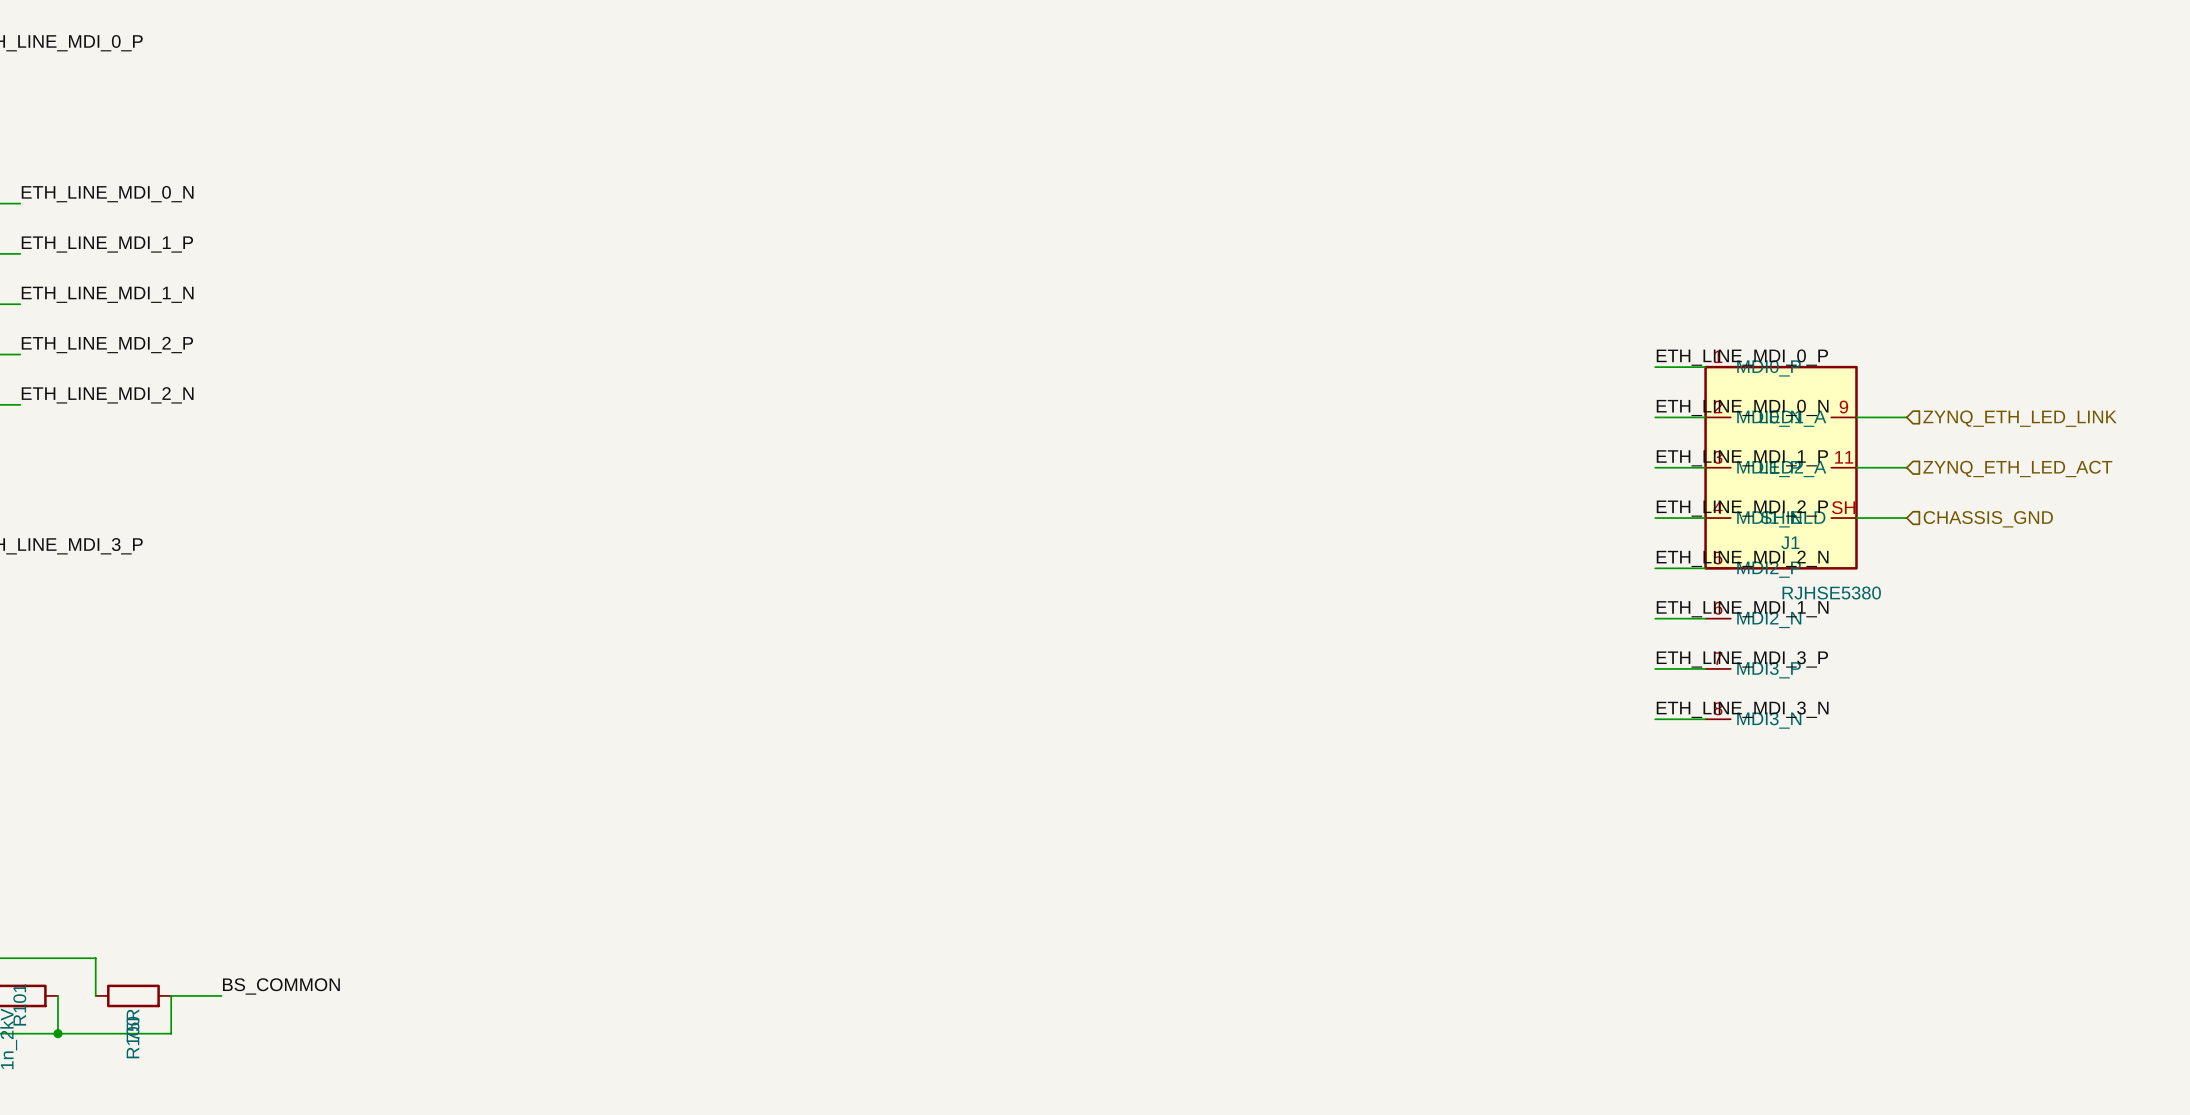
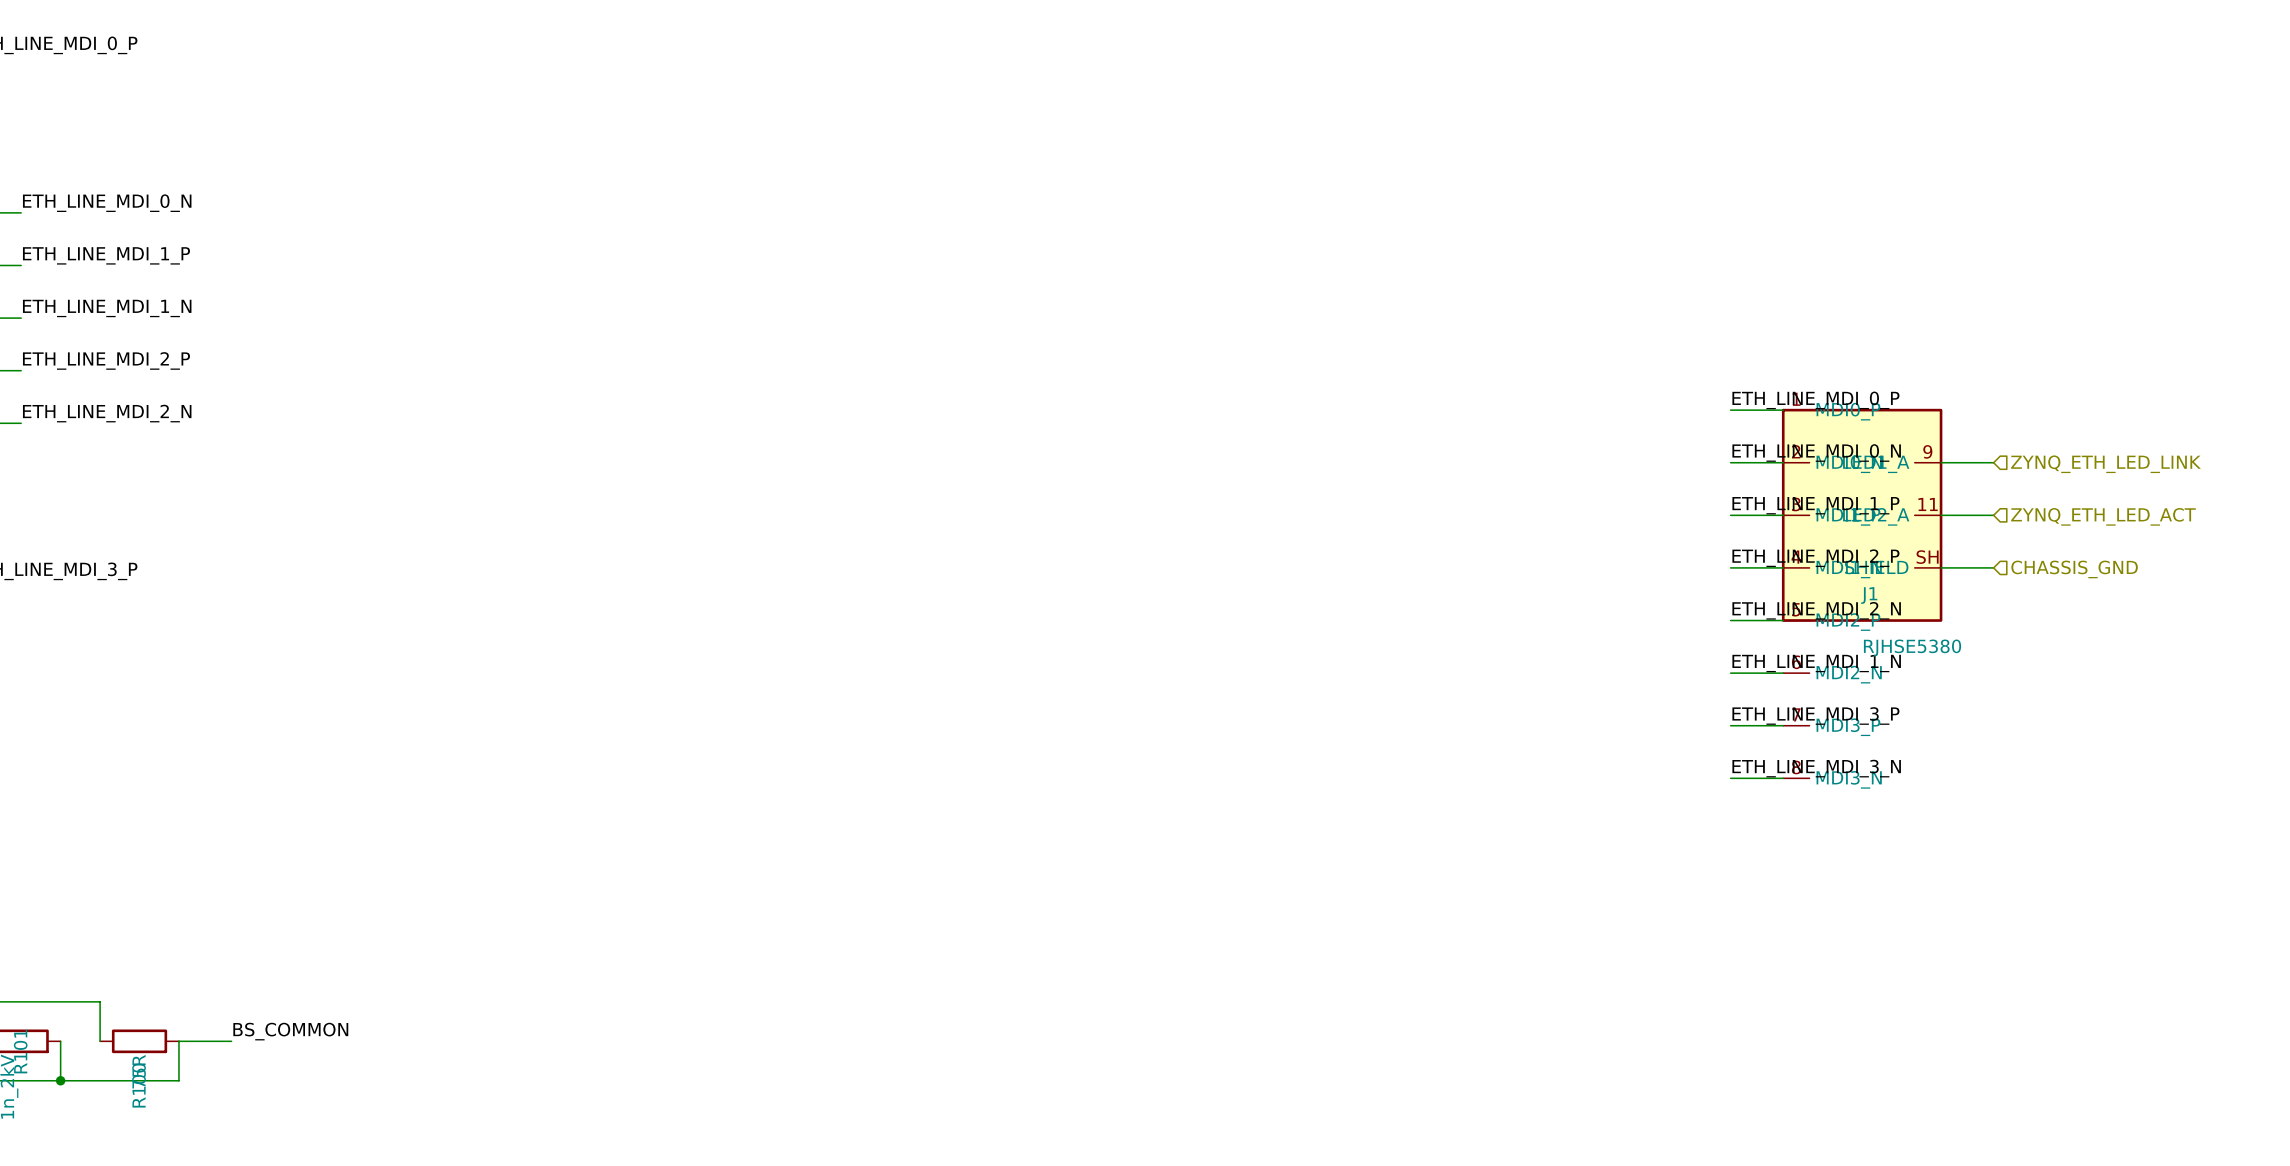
label position: ETH_LINE_MDI_0_P (1742, 357) -> ETH_LINE_MDI_0_P (1815, 400)
wire: (1655, 367) (1705, 367) -> (1730, 410) (1783, 410)
label position: ETH_LINE_MDI_0_N (1742, 407) -> ETH_LINE_MDI_0_N (1816, 453)
wire: (1655, 417) (1705, 417) -> (1730, 462) (1783, 462)
wire: (1856, 417) (1906, 417) -> (1941, 462) (1993, 462)
hierarchical label position: ZYNQ_ETH_LED_LINK (2019, 418) -> ZYNQ_ETH_LED_LINK (2105, 464)
label position: ETH_LINE_MDI_1_P (1742, 458) -> ETH_LINE_MDI_1_P (1815, 505)
wire: (1655, 467) (1705, 467) -> (1730, 515) (1783, 515)
wire: (1856, 467) (1906, 467) -> (1941, 515) (1993, 515)
hierarchical label position: ZYNQ_ETH_LED_ACT (2017, 468) -> ZYNQ_ETH_LED_ACT (2103, 516)
label position: ETH_LINE_MDI_2_P (1742, 508) -> ETH_LINE_MDI_2_P (1815, 558)
wire: (1655, 518) (1705, 518) -> (1730, 567) (1783, 567)
wire: (1856, 518) (1906, 518) -> (1941, 567) (1993, 567)
hierarchical label position: CHASSIS_GND (1988, 519) -> CHASSIS_GND (2074, 569)
J1 position: (1781, 542) -> (1862, 593)
label position: ETH_LINE_MDI_2_N (1742, 558) -> ETH_LINE_MDI_2_N (1816, 610)
wire: (1655, 568) (1705, 568) -> (1730, 620) (1783, 620)
label position: ETH_LINE_MDI_1_N (1742, 609) -> ETH_LINE_MDI_1_N (1816, 663)
wire: (1655, 618) (1705, 618) -> (1730, 673) (1783, 673)
label position: ETH_LINE_MDI_3_P (1742, 659) -> ETH_LINE_MDI_3_P (1815, 716)
wire: (1655, 668) (1705, 668) -> (1730, 725) (1783, 725)
label position: ETH_LINE_MDI_3_N (1742, 709) -> ETH_LINE_MDI_3_N (1816, 768)
wire: (1655, 719) (1705, 719) -> (1730, 778) (1783, 778)

